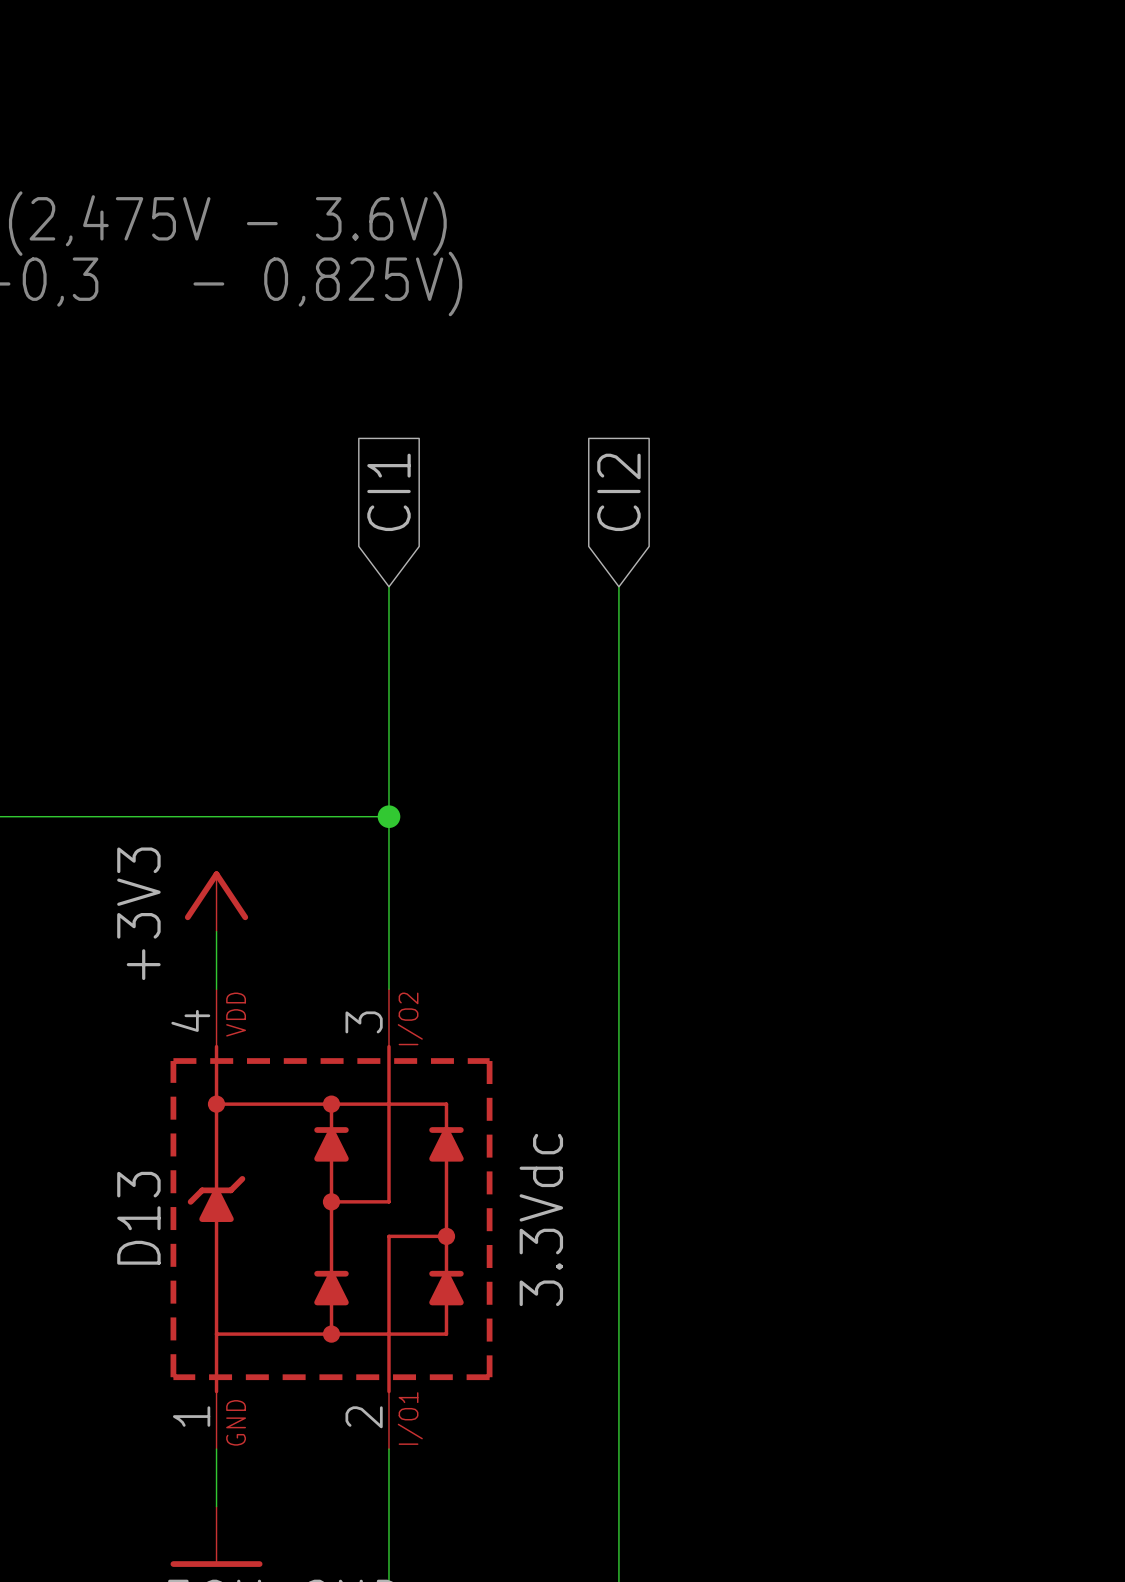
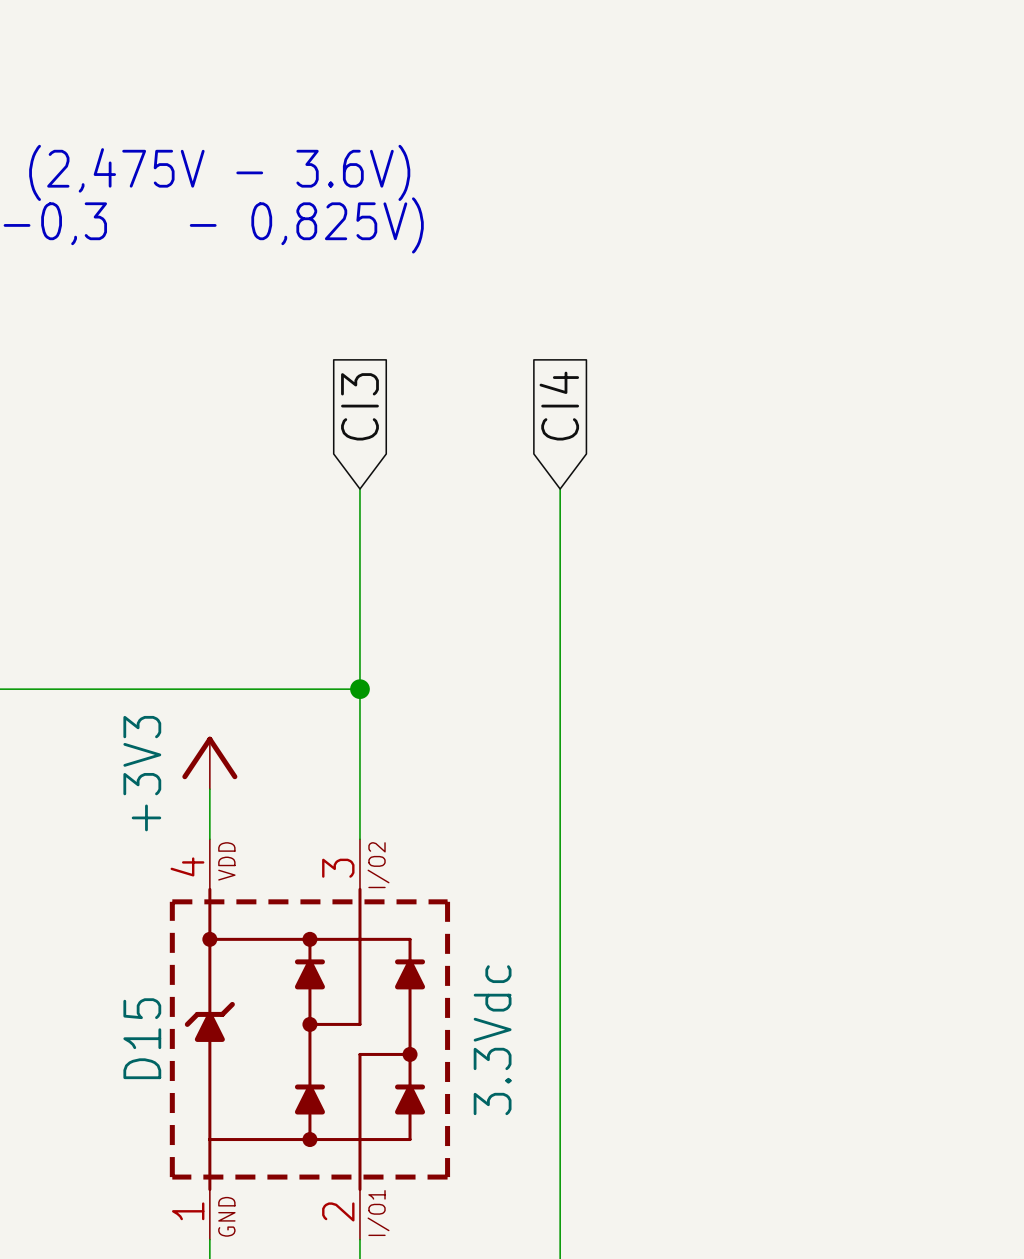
global label: CI1 (388, 492) -> CI3 (359, 406)
global label: CI2 (618, 492) -> CI4 (559, 406)
D13 name: D13 (138, 1218) -> D15 (142, 1038)

